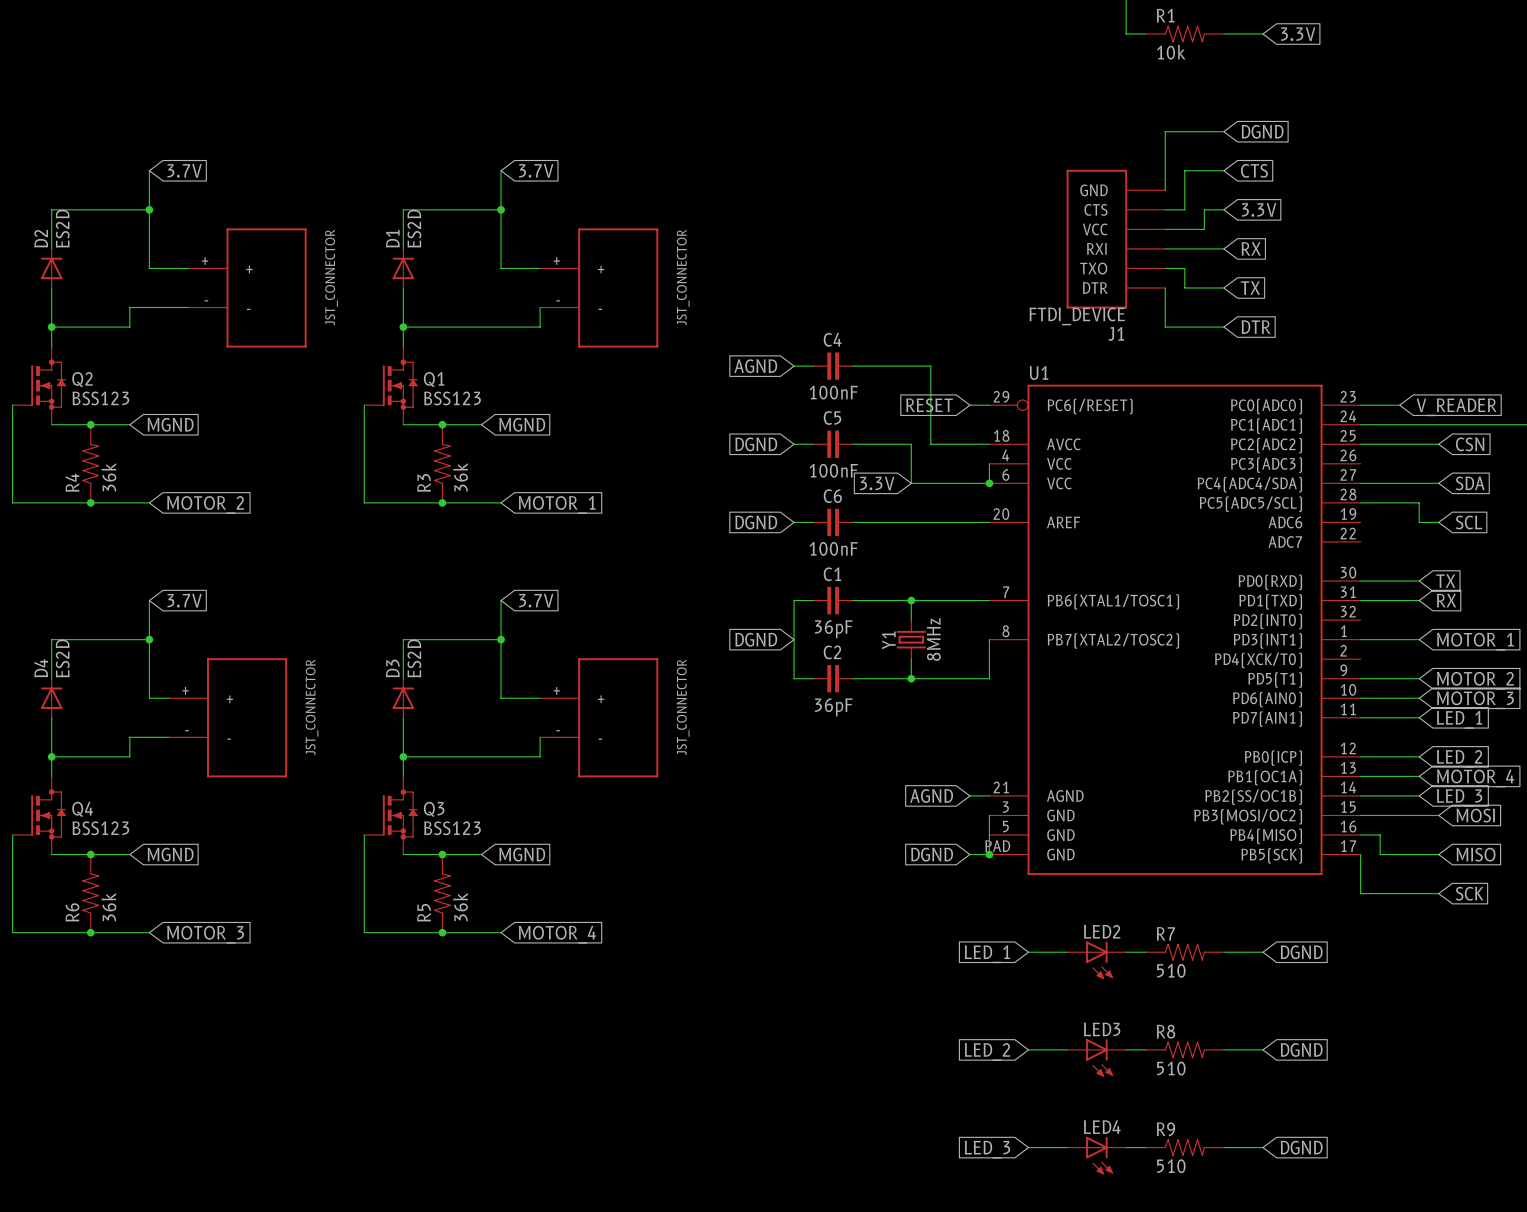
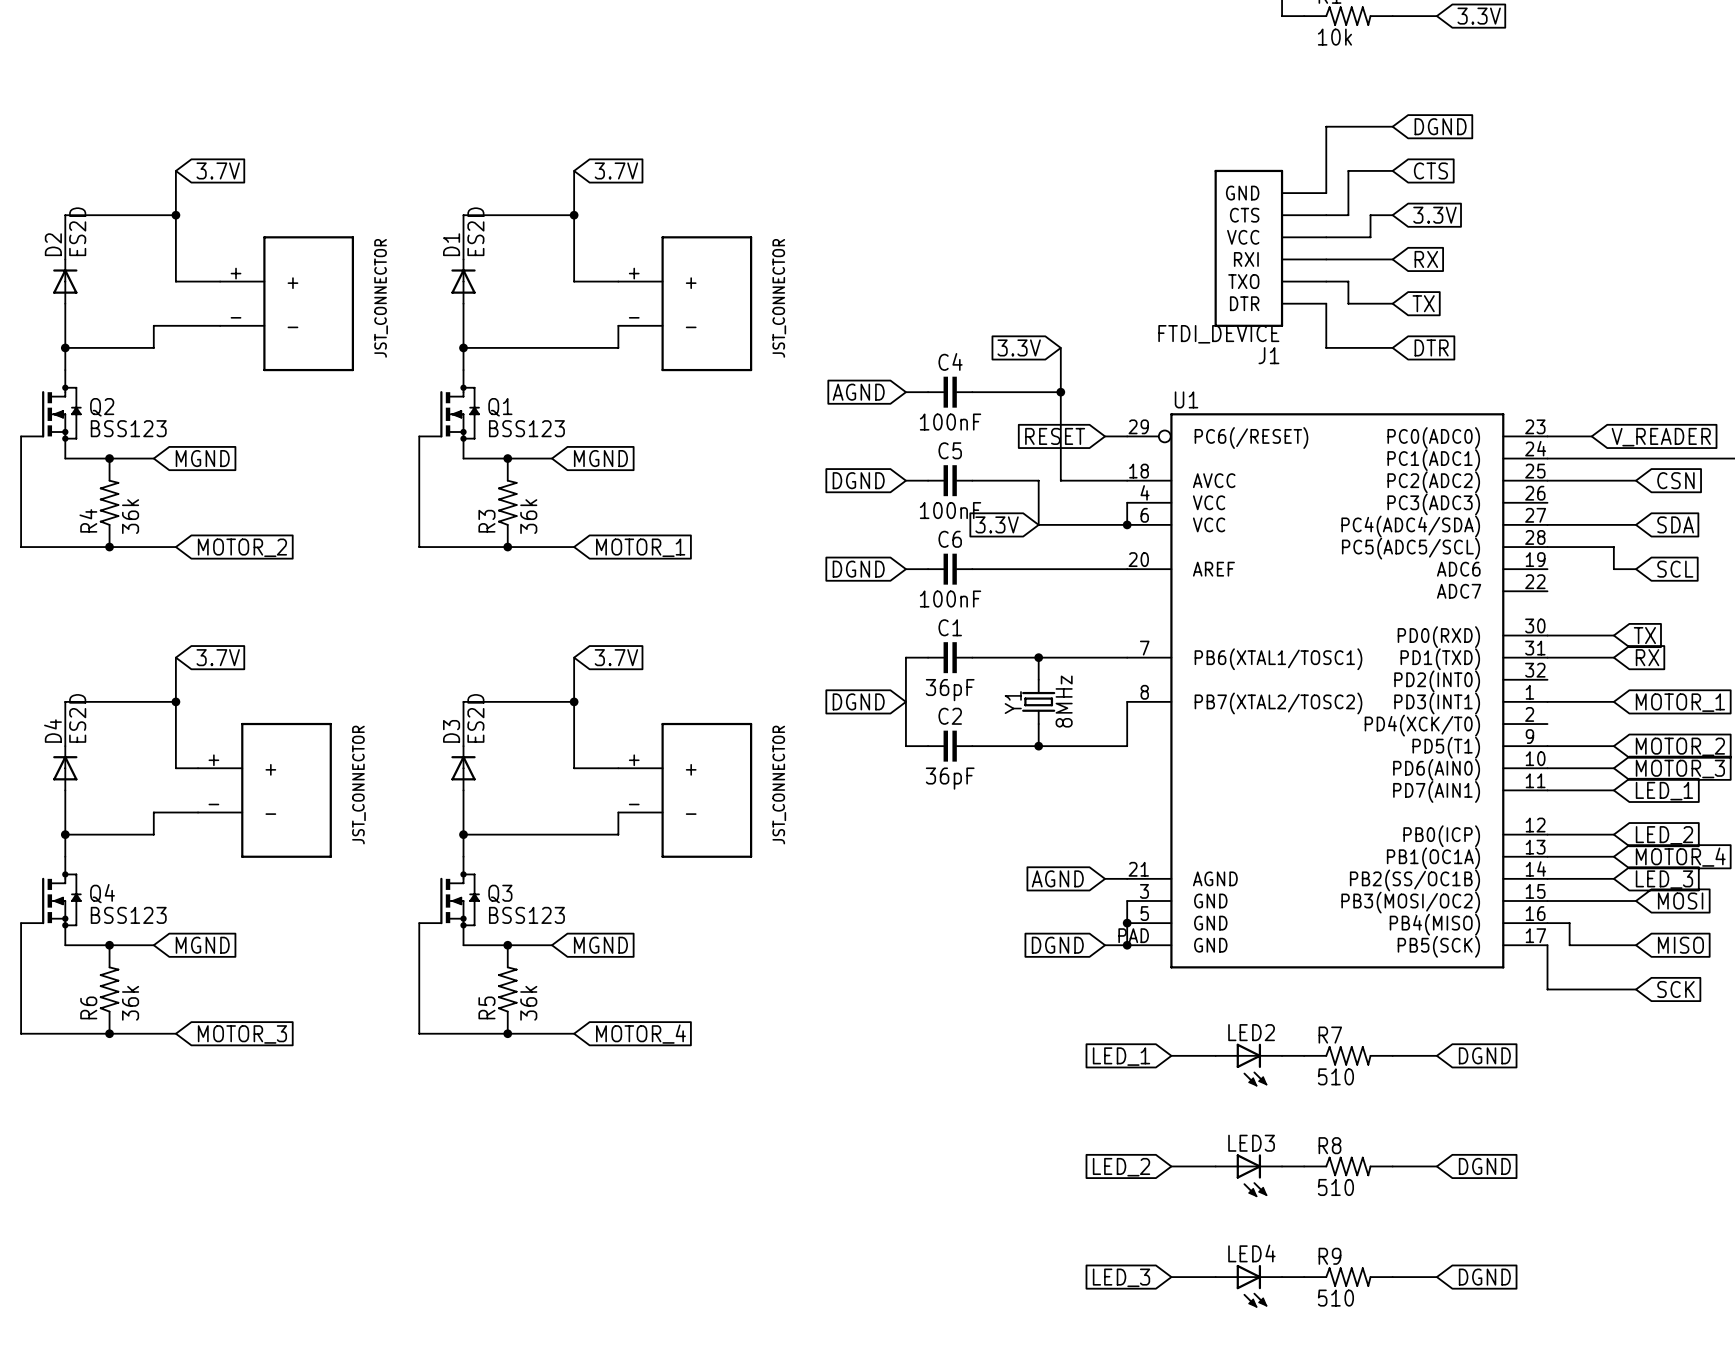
global label: none -> 3.3V (1019, 347)
wire: none -> (1060, 347) (1060, 392)
junction: none -> (1060, 392)
junction: none -> (1127, 923)

